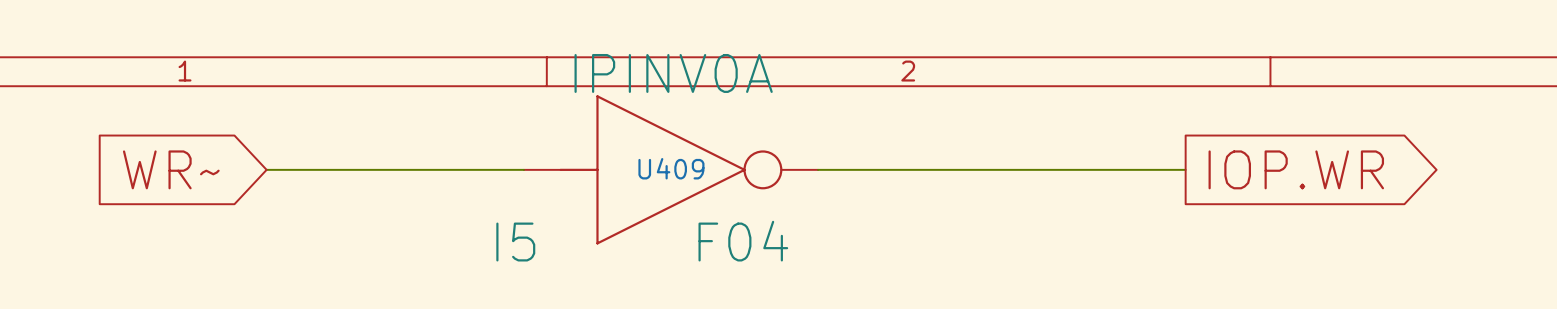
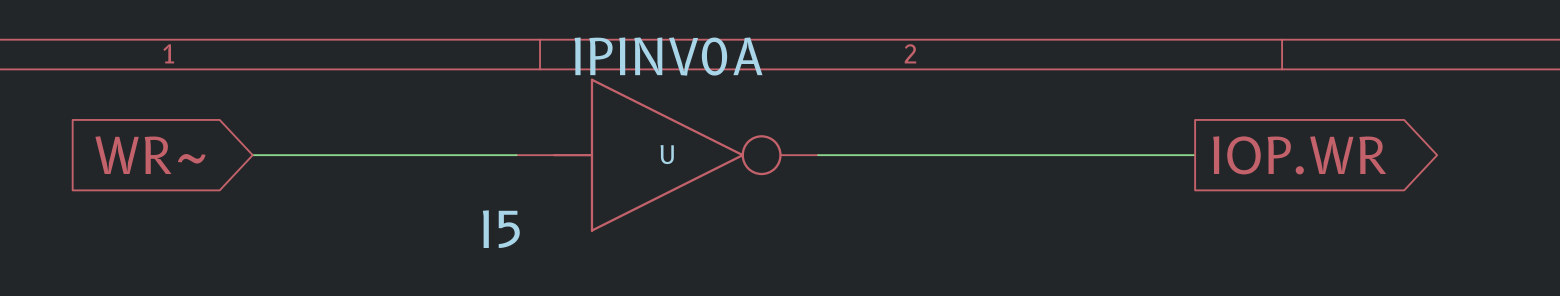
U409 name: U409 (671, 168) -> U (667, 154)
U409 value: F04 (743, 241) -> none

